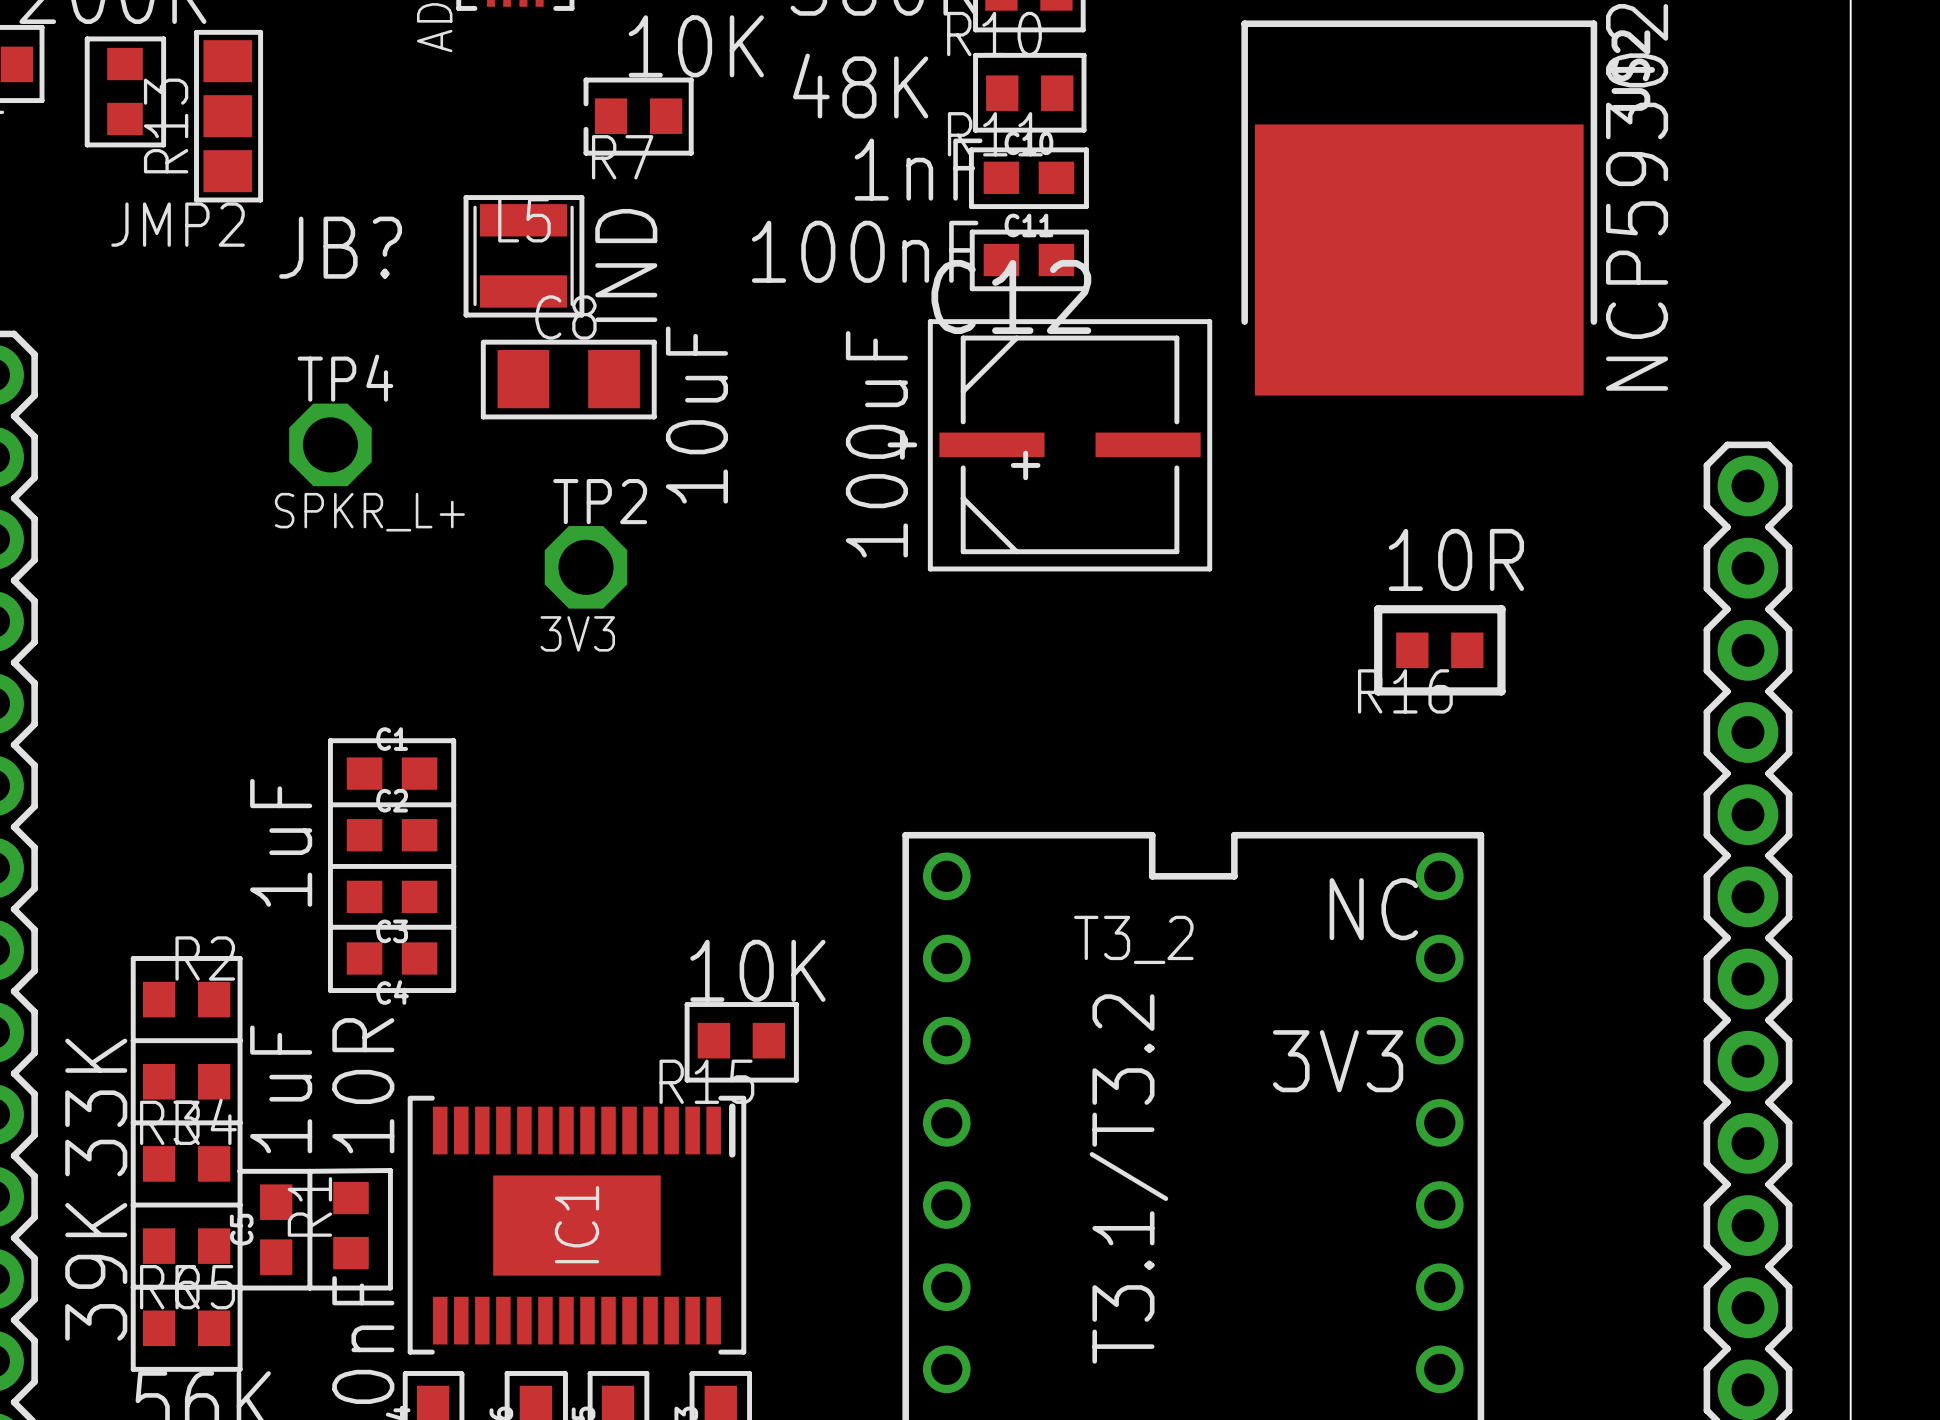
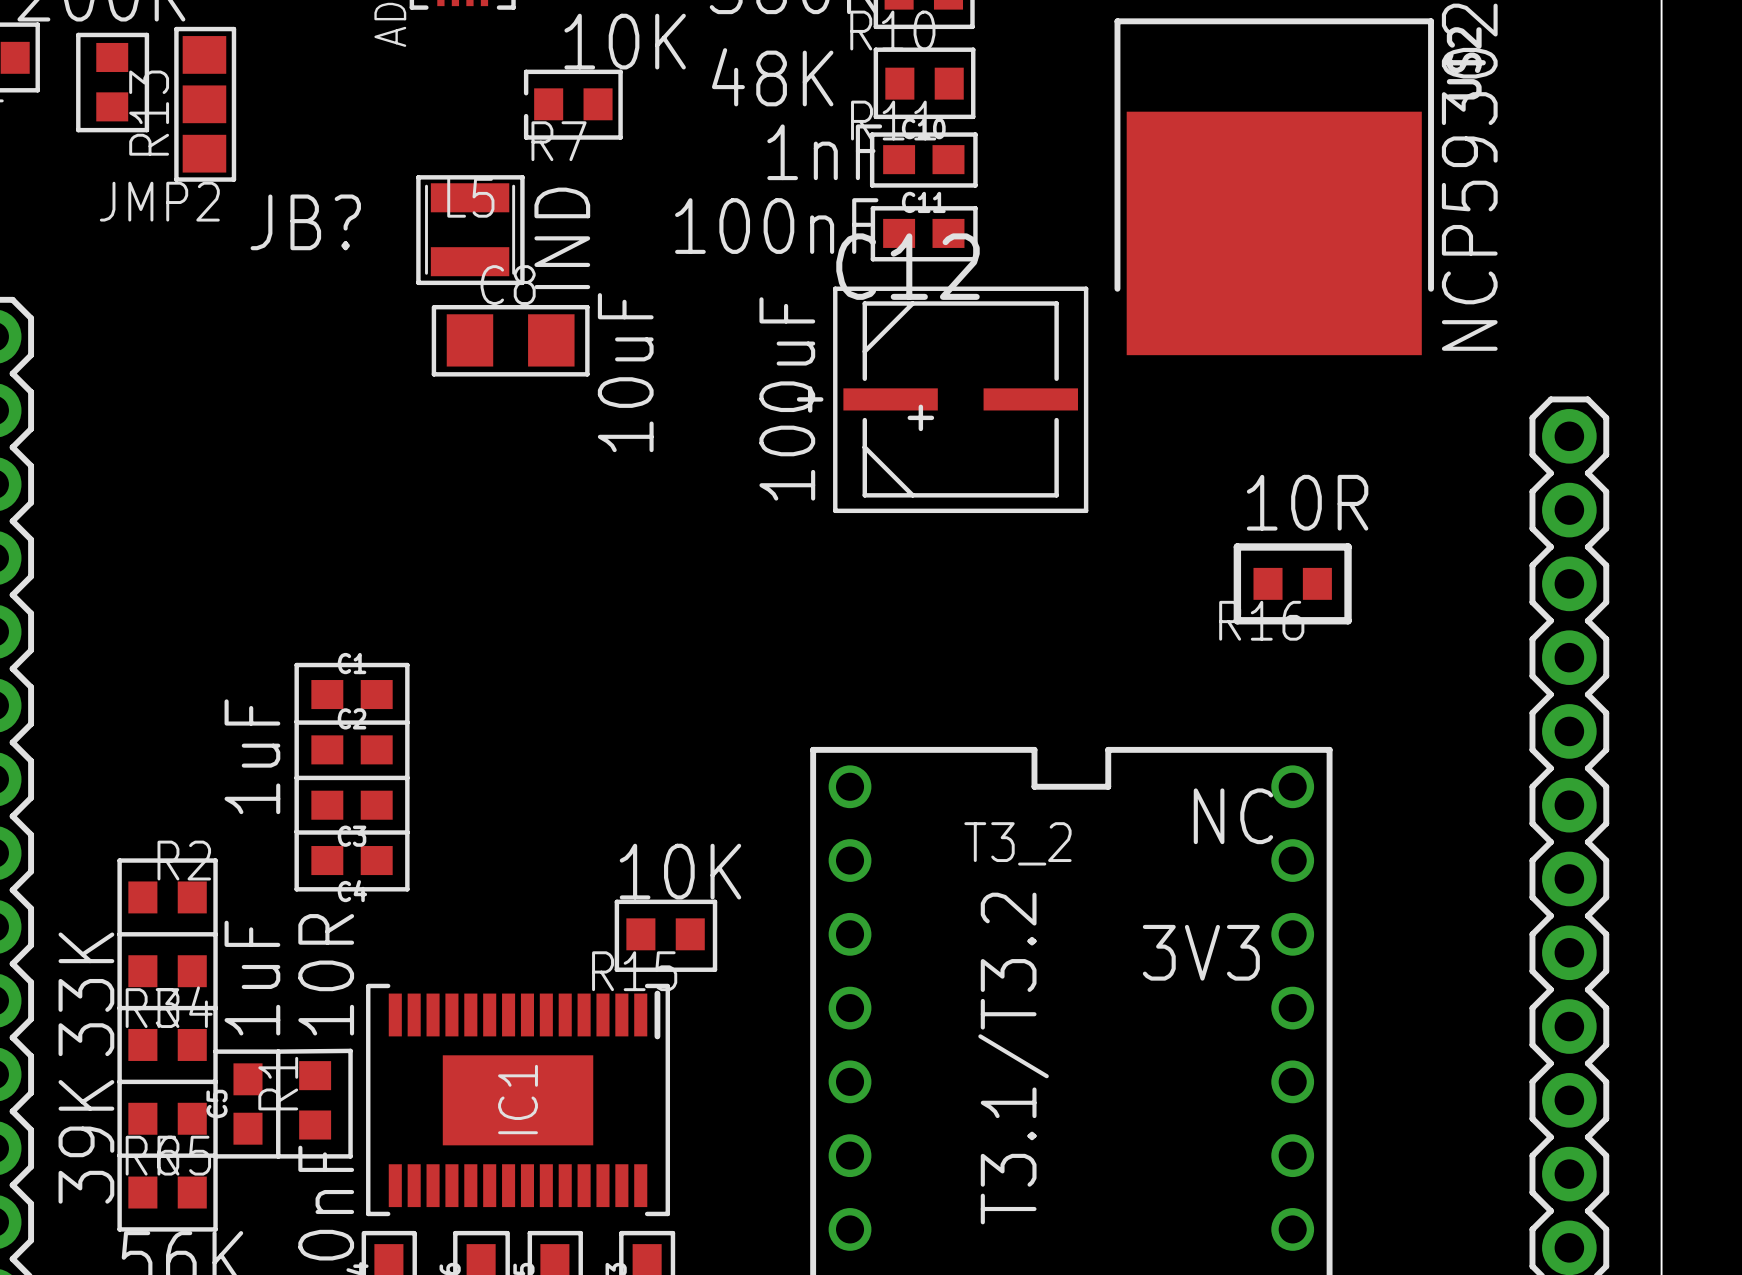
TP4: (330, 444) -> none
text: SPKR_L+ (369, 512) -> none
TP2: (586, 567) -> none
text: 3V3 (577, 633) -> none

